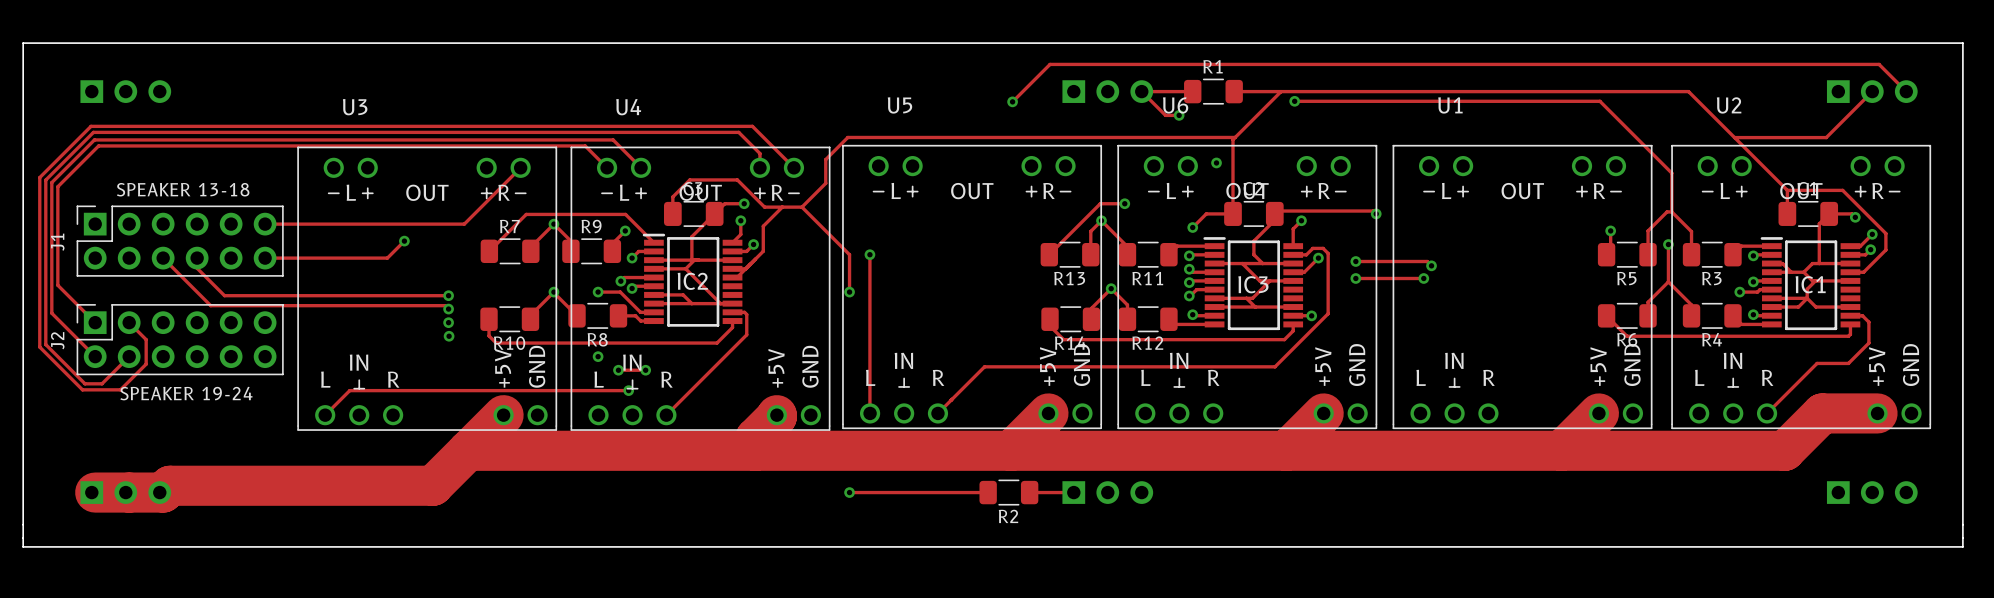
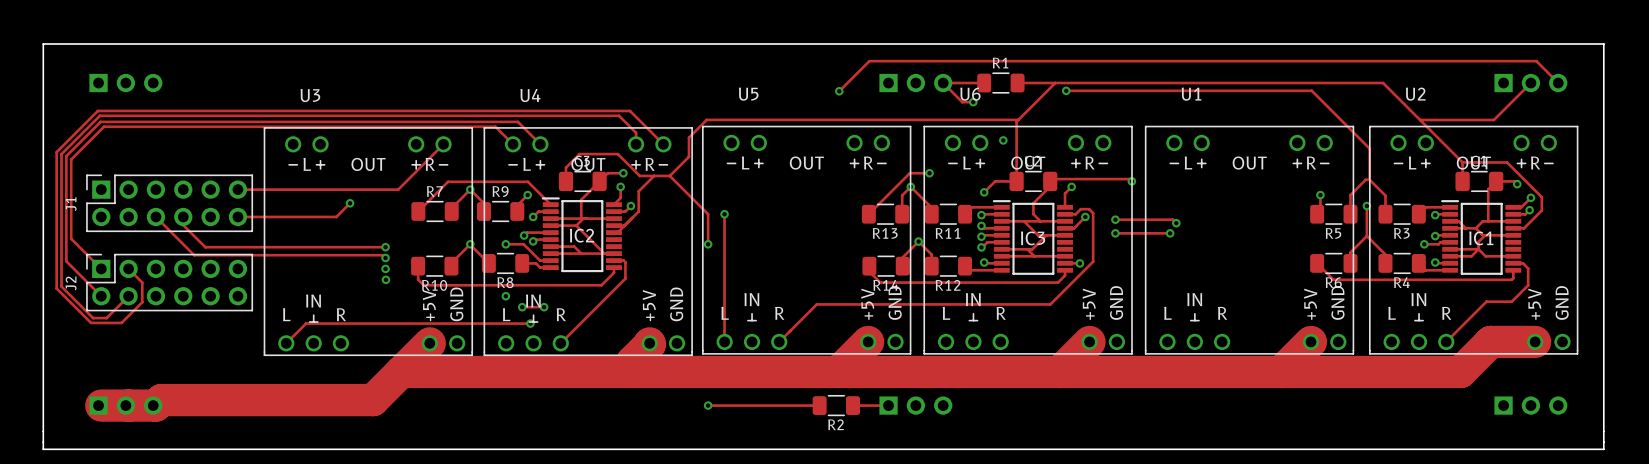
text: SPEAKER 13-18 (183, 189) -> none
text: SPEAKER 19-24 (186, 393) -> none

